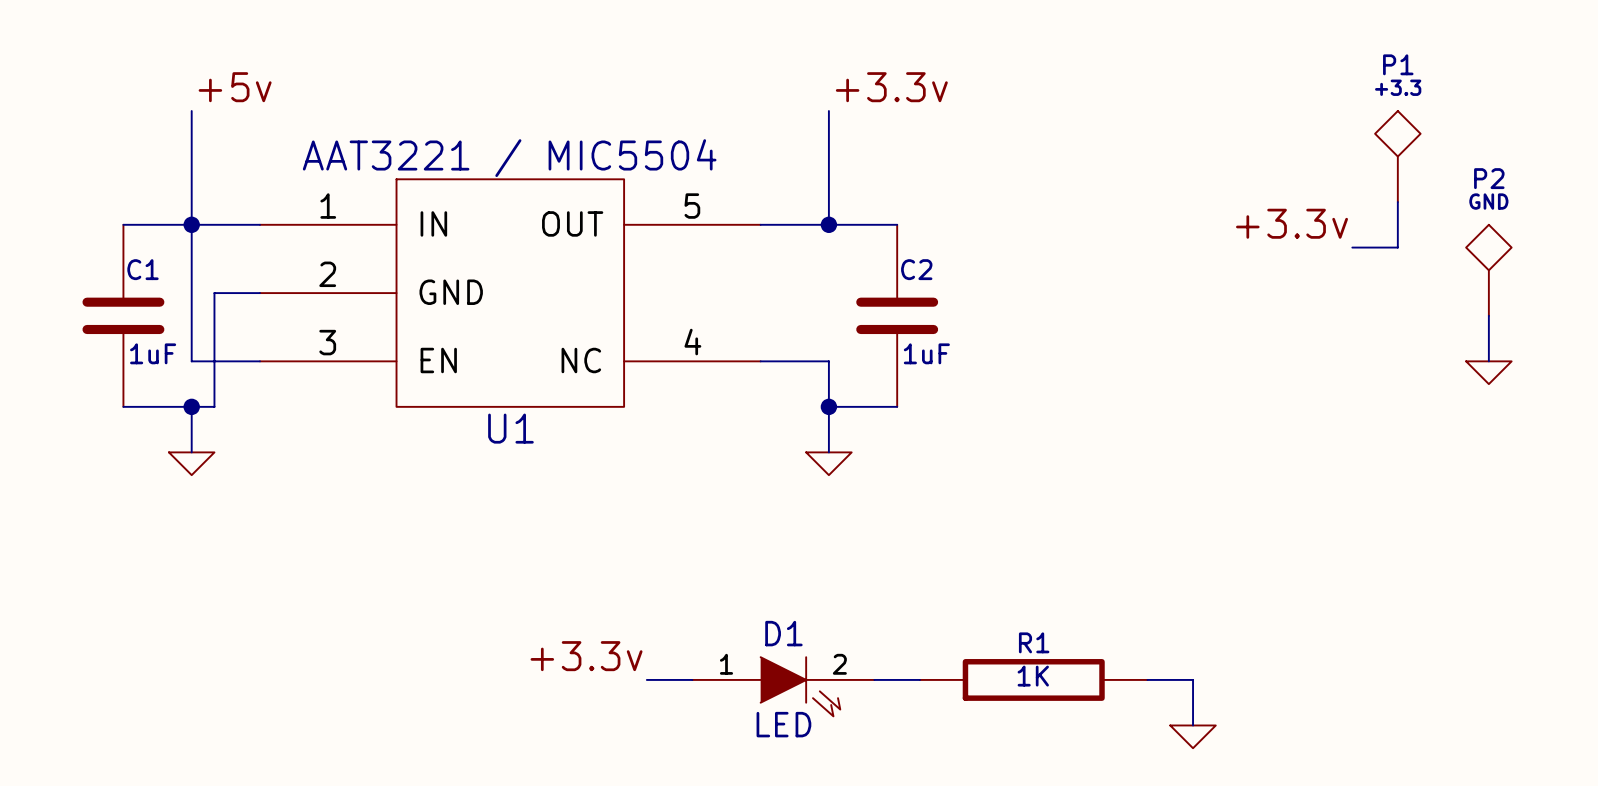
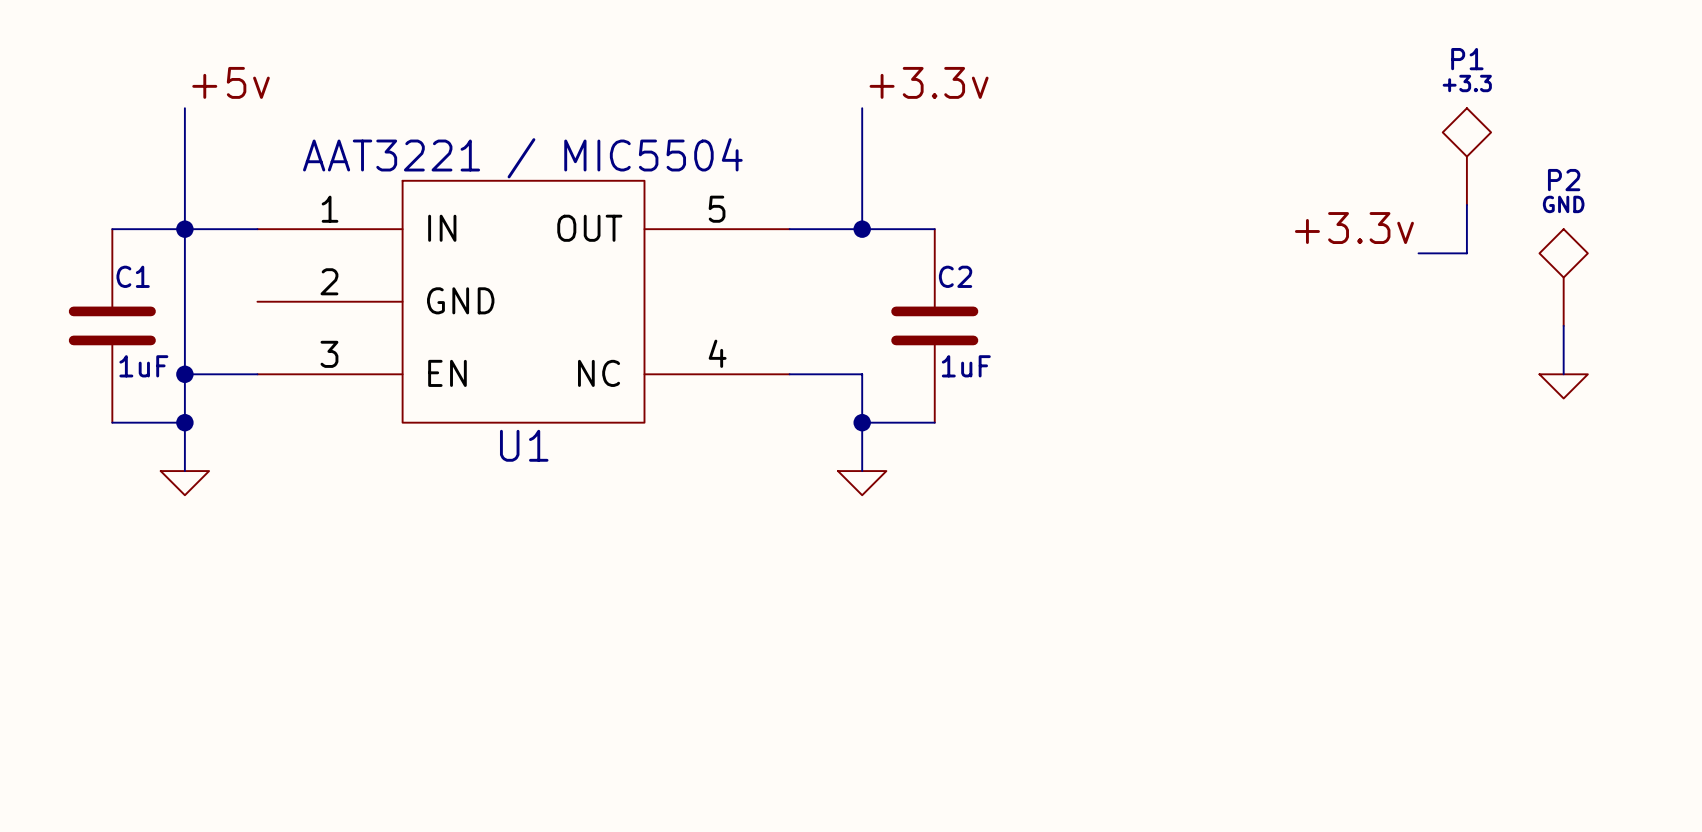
wire: (259, 293) (214, 293) (214, 406) (191, 406) -> (184, 374) (184, 422)
junction: none -> (184, 374)
label: +3.3v (586, 656) -> none
wire: (646, 679) (692, 679) -> none
wire: (874, 679) (919, 679) -> none
R1: 1K (1033, 679) -> none
wire: (1147, 679) (1193, 679) (1193, 725) -> none
D1: LED (783, 686) -> none
power symbol: (1193, 736) -> none

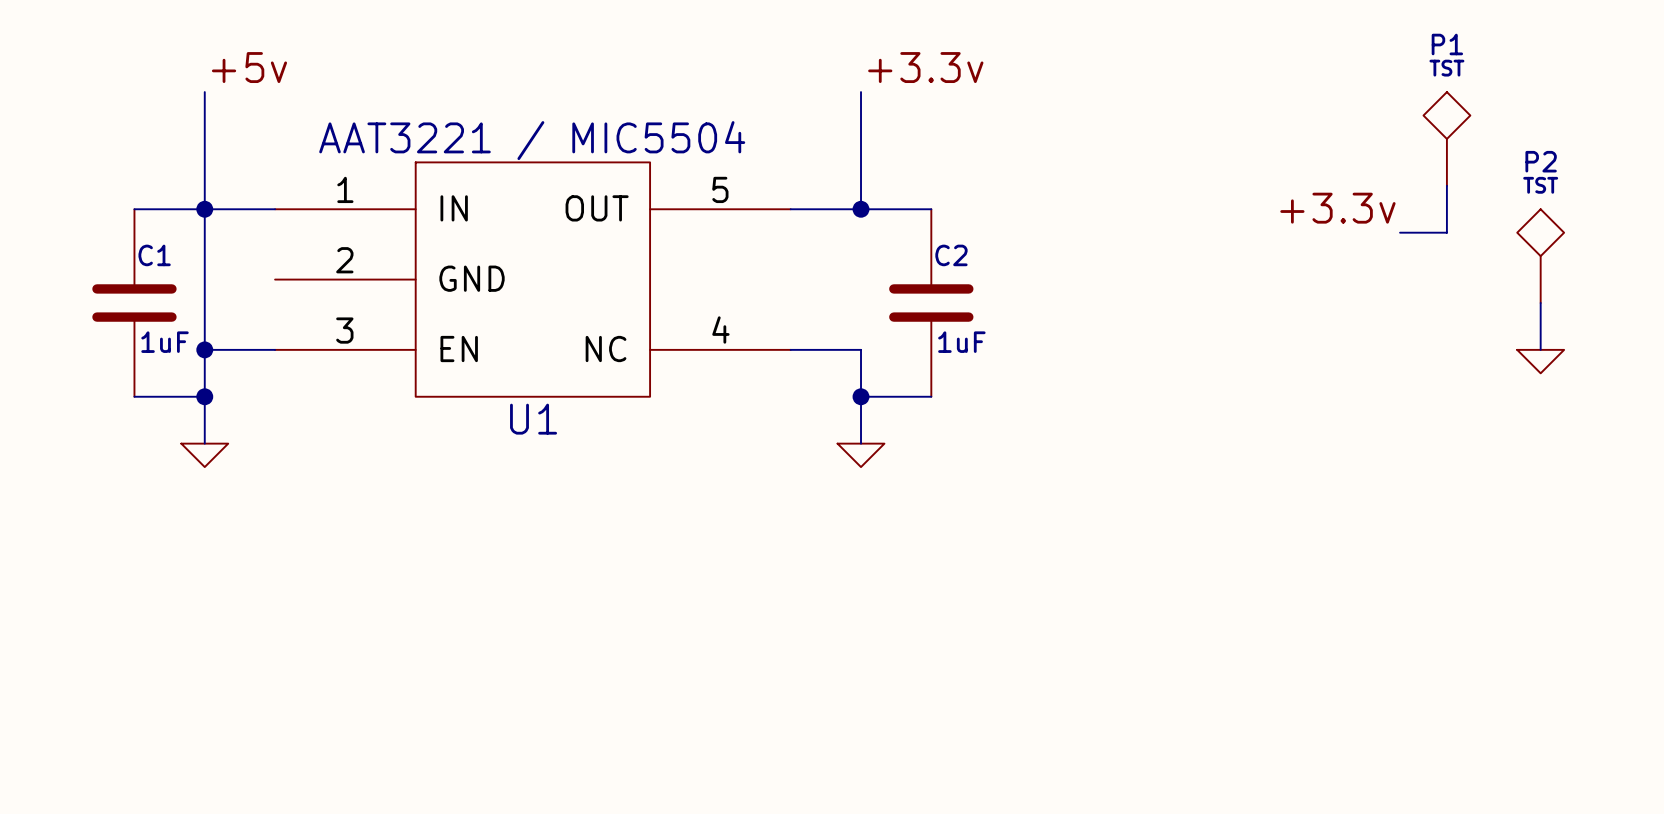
P1 value: +3.3 (1467, 83) -> TST (1446, 68)
P2 value: GND (1563, 204) -> TST (1540, 185)

